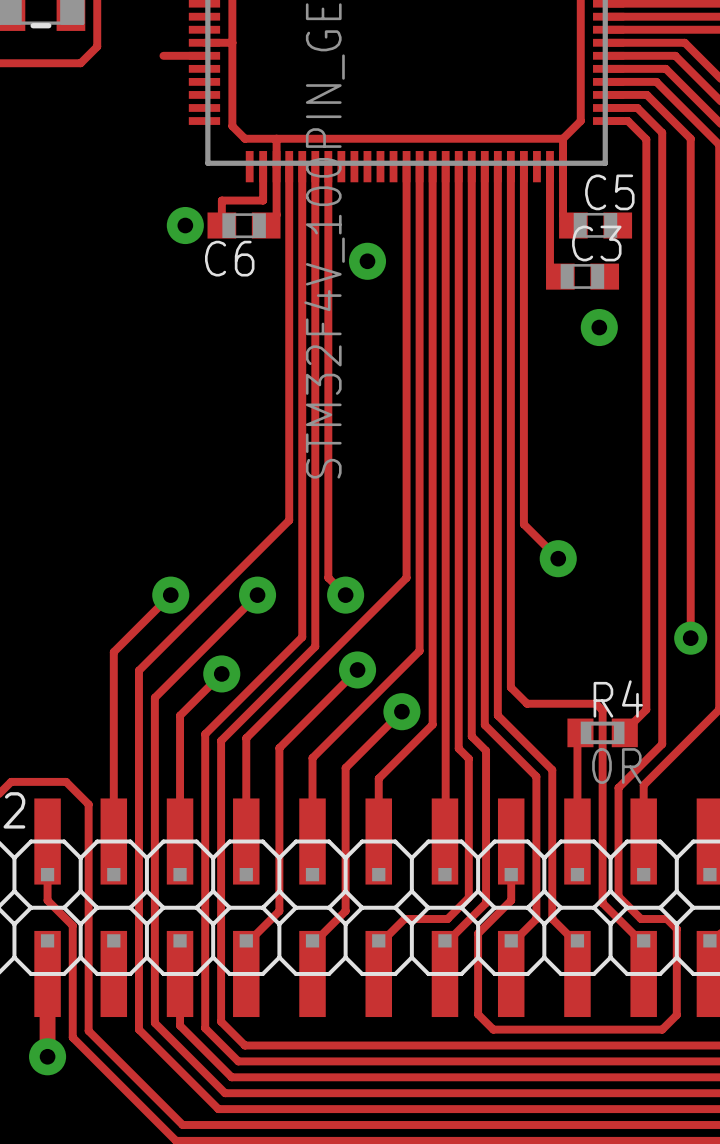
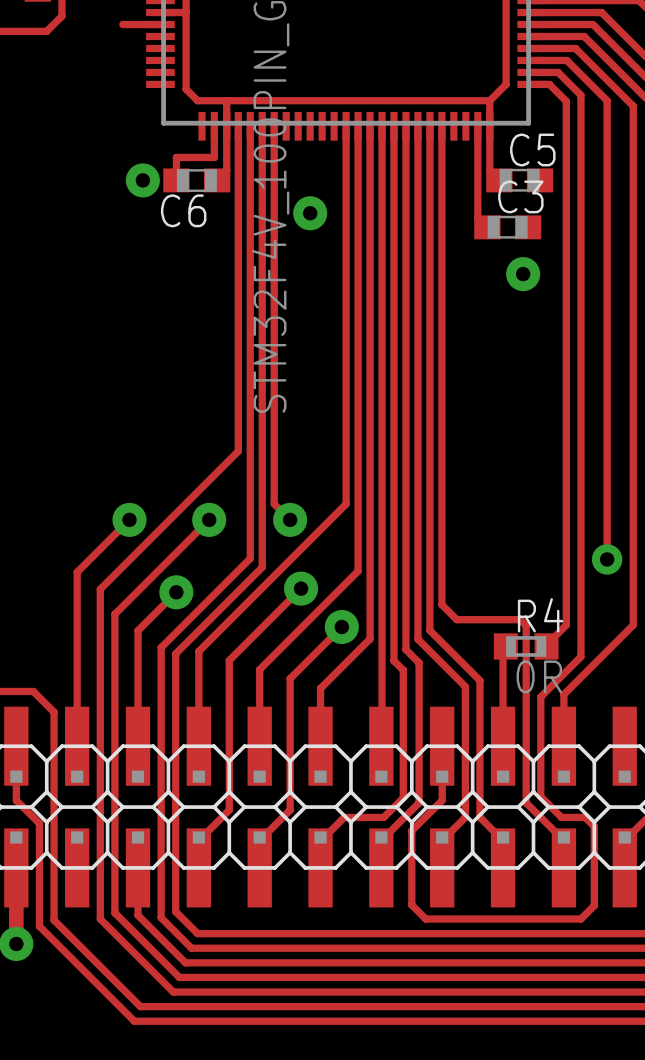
track: (523, 166) (523, 524) (558, 558) -> none
via: (558, 558) -> none

